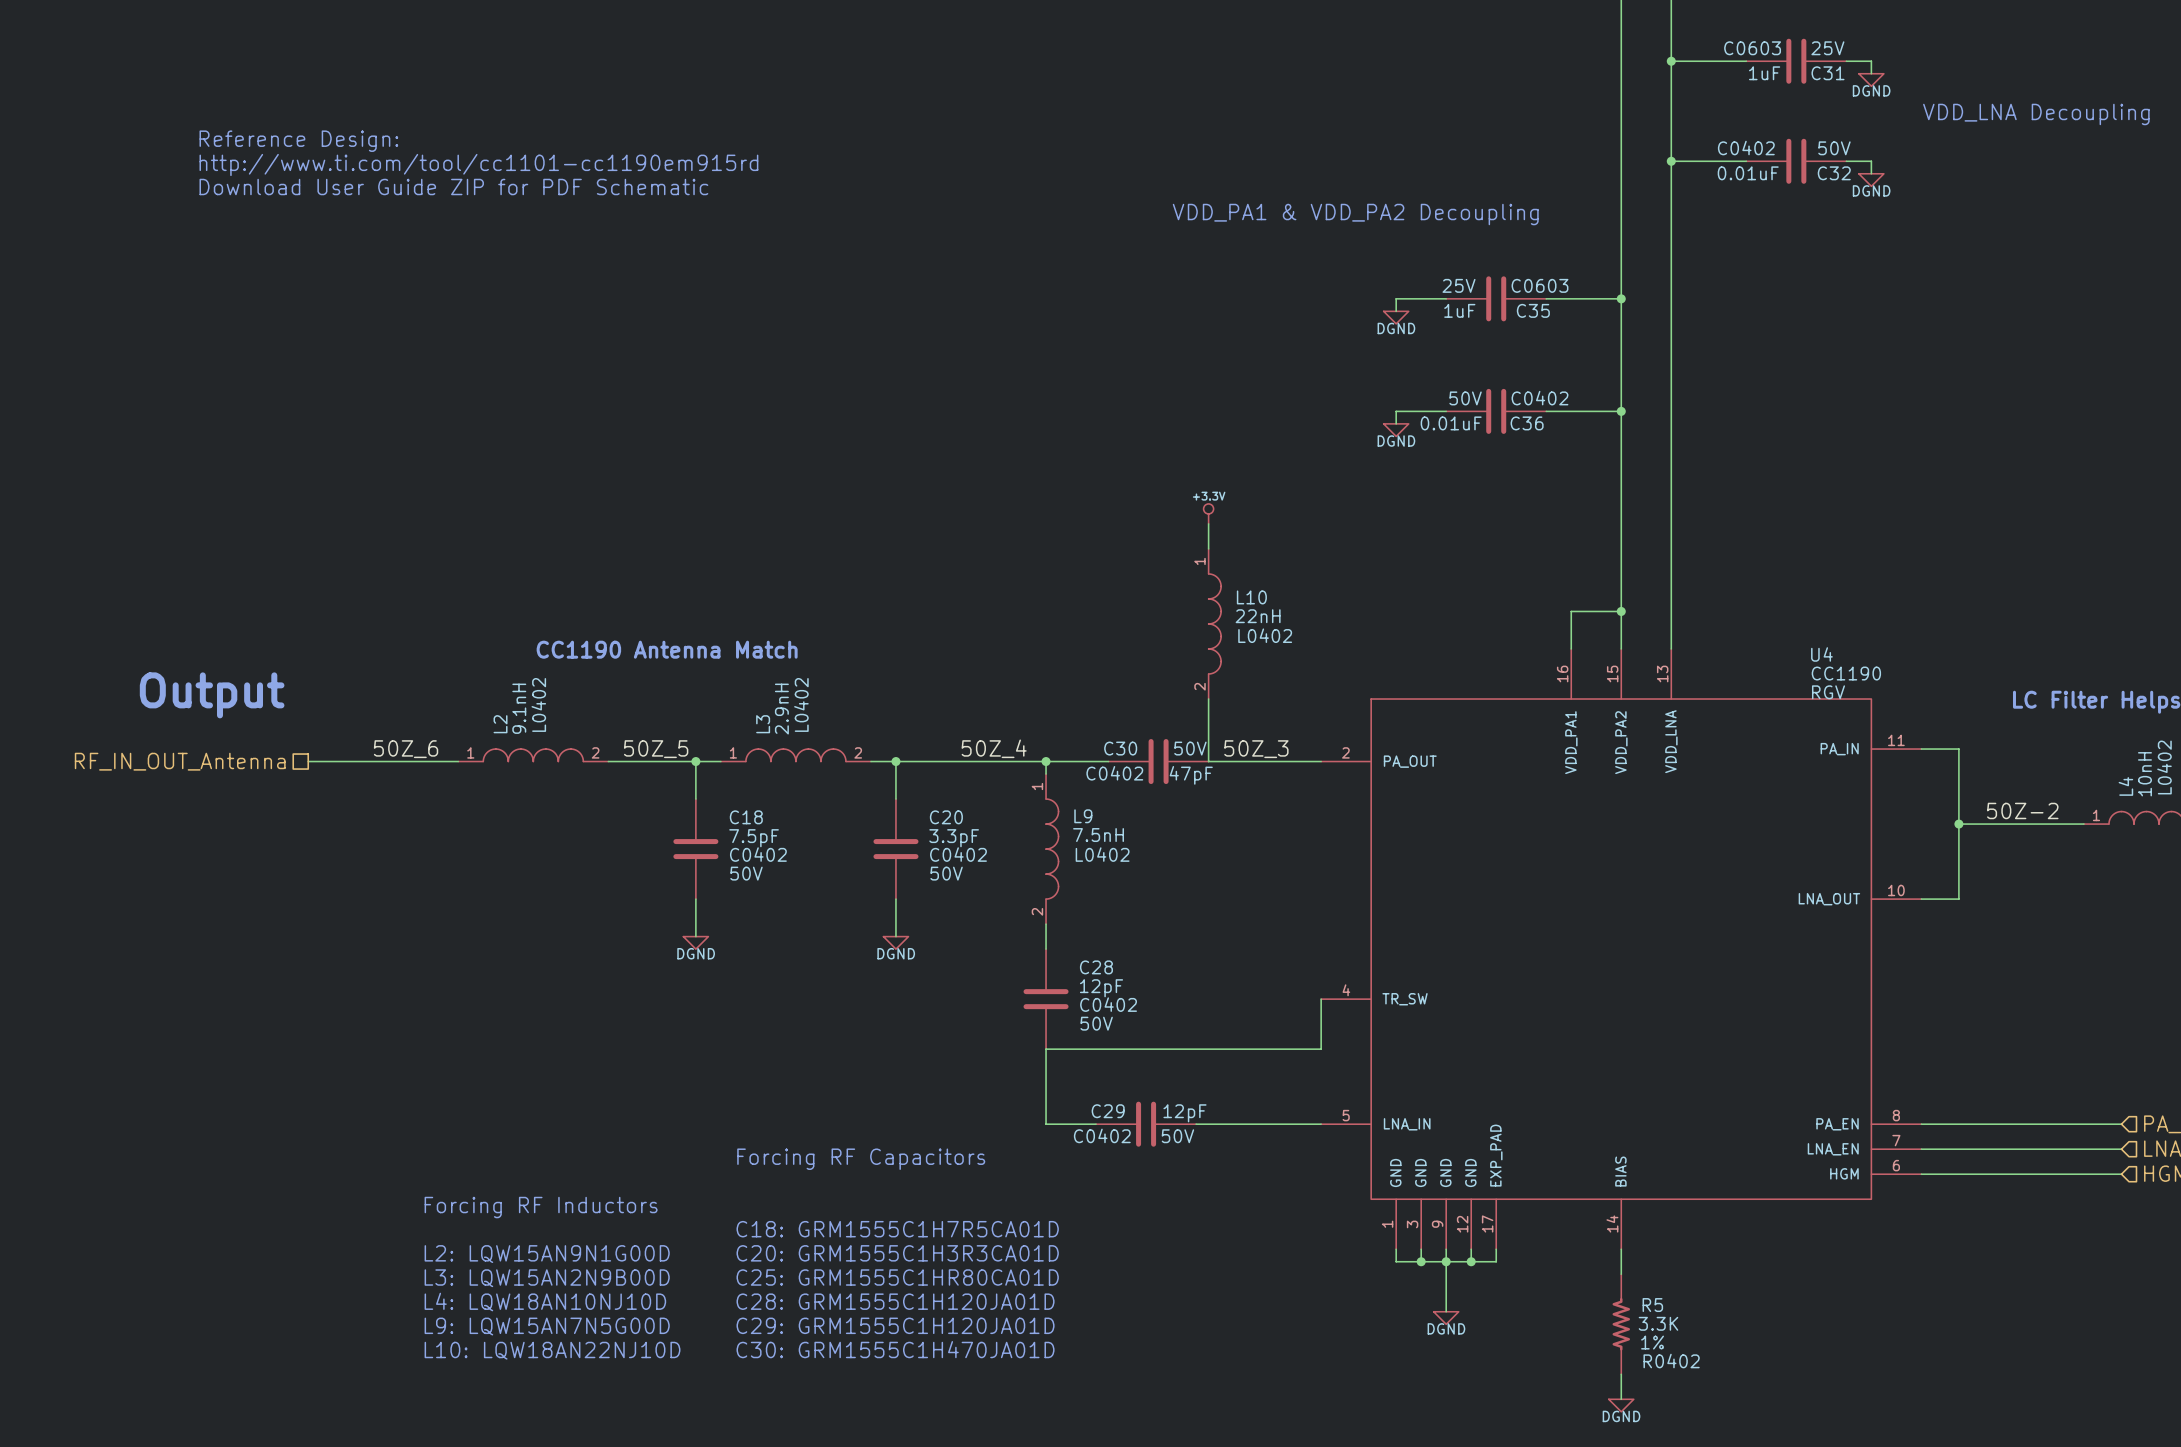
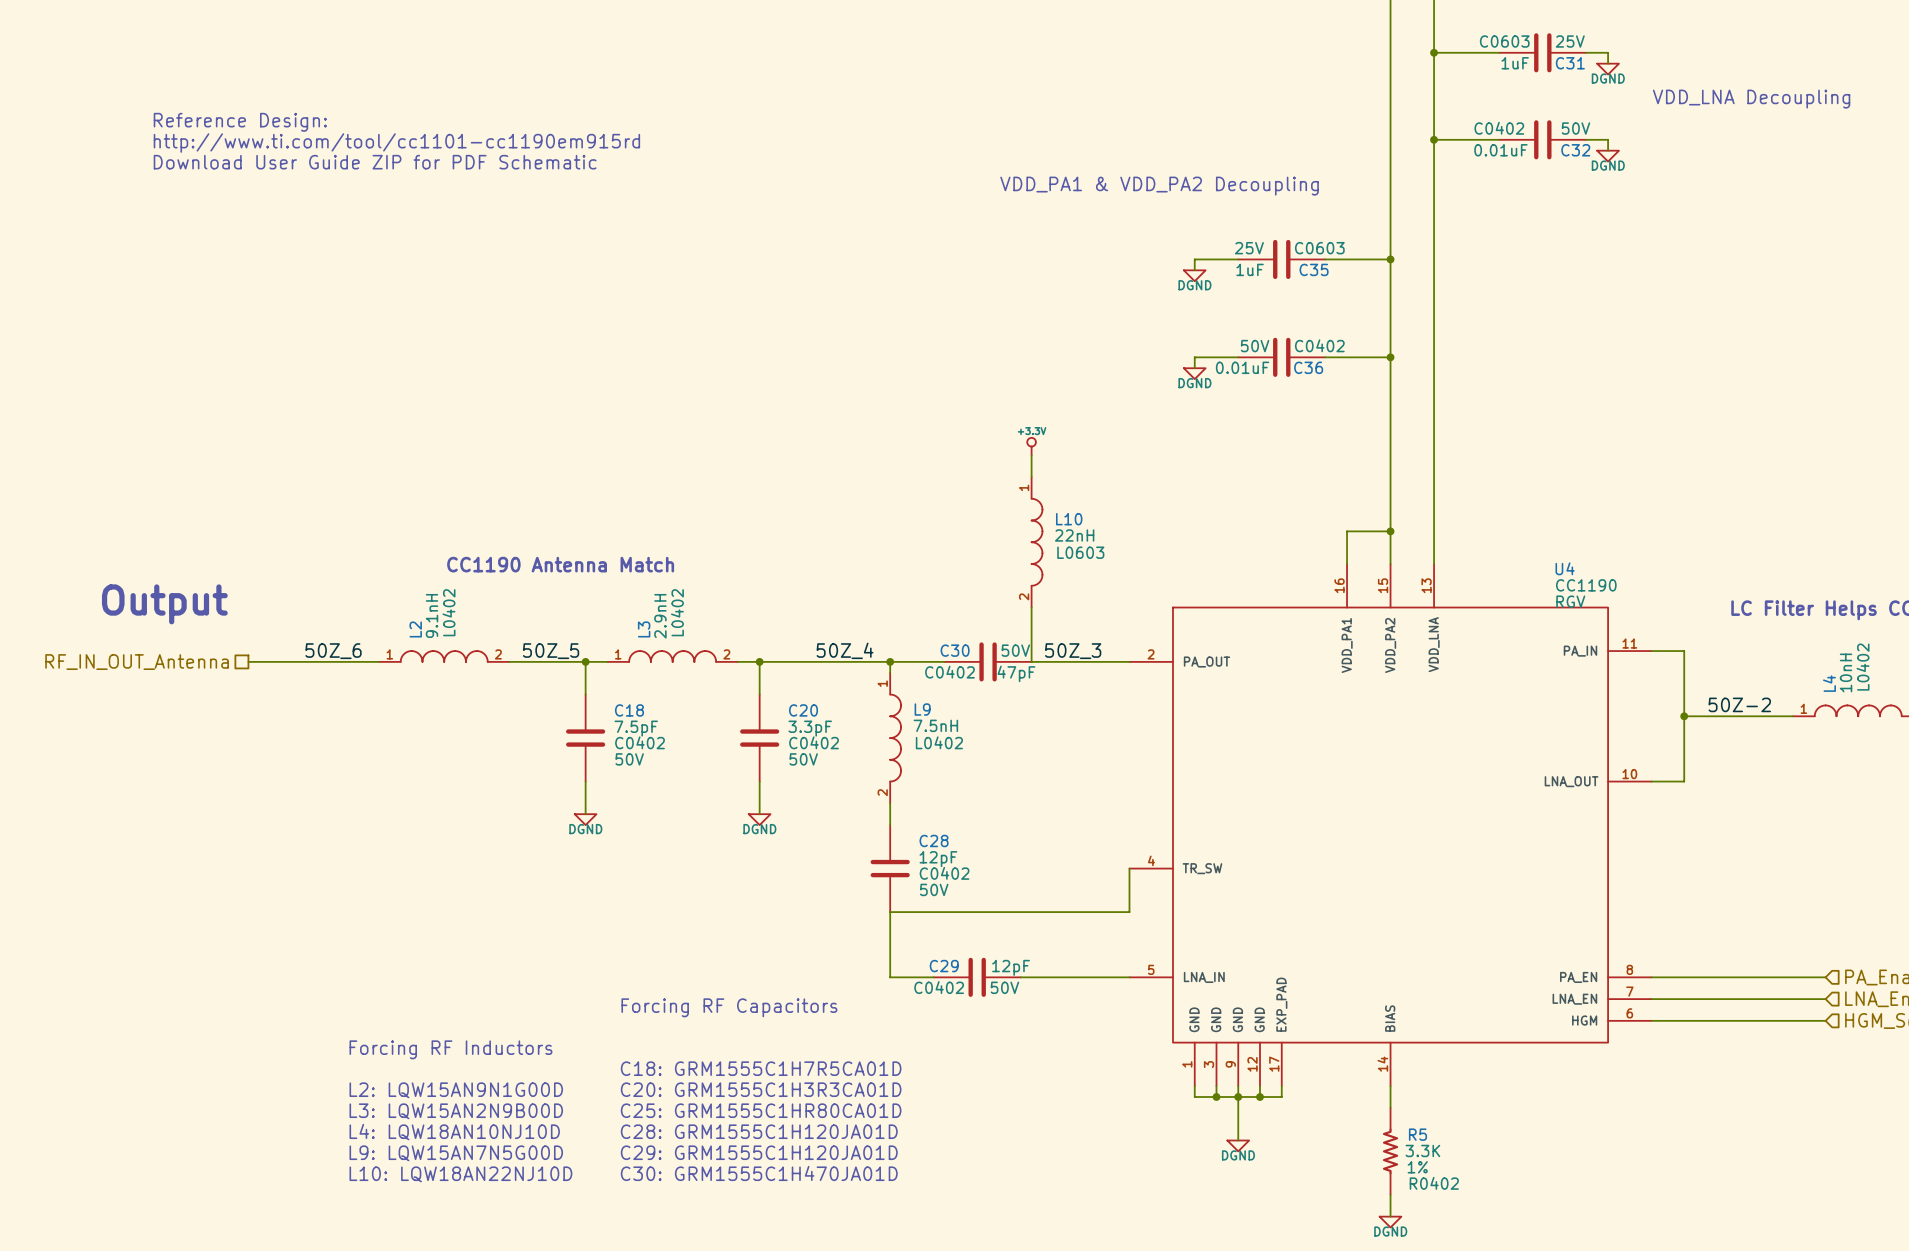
L10 text: L0402 (1265, 635) -> L0603 (1080, 552)

